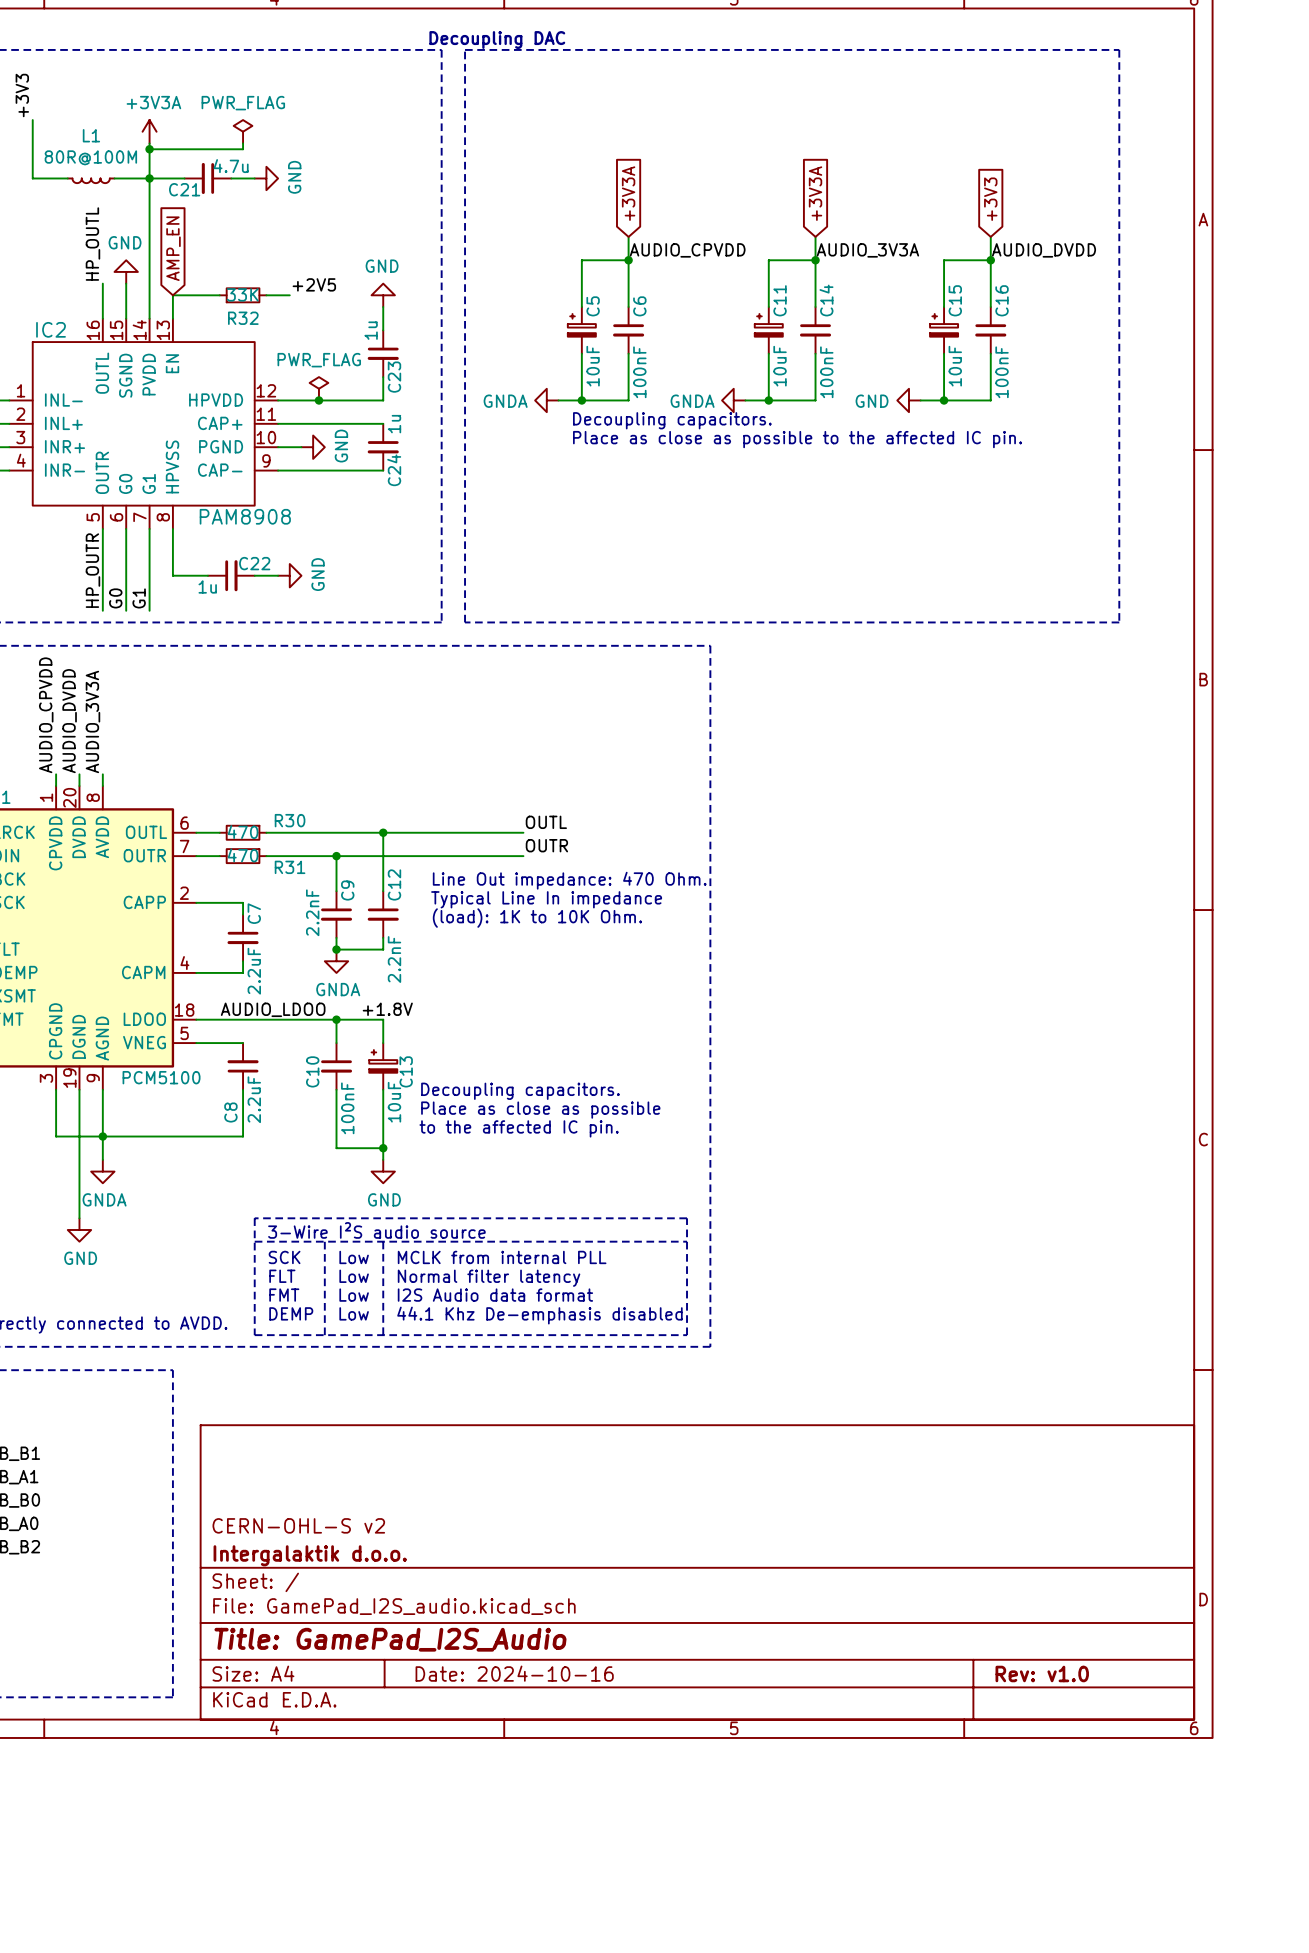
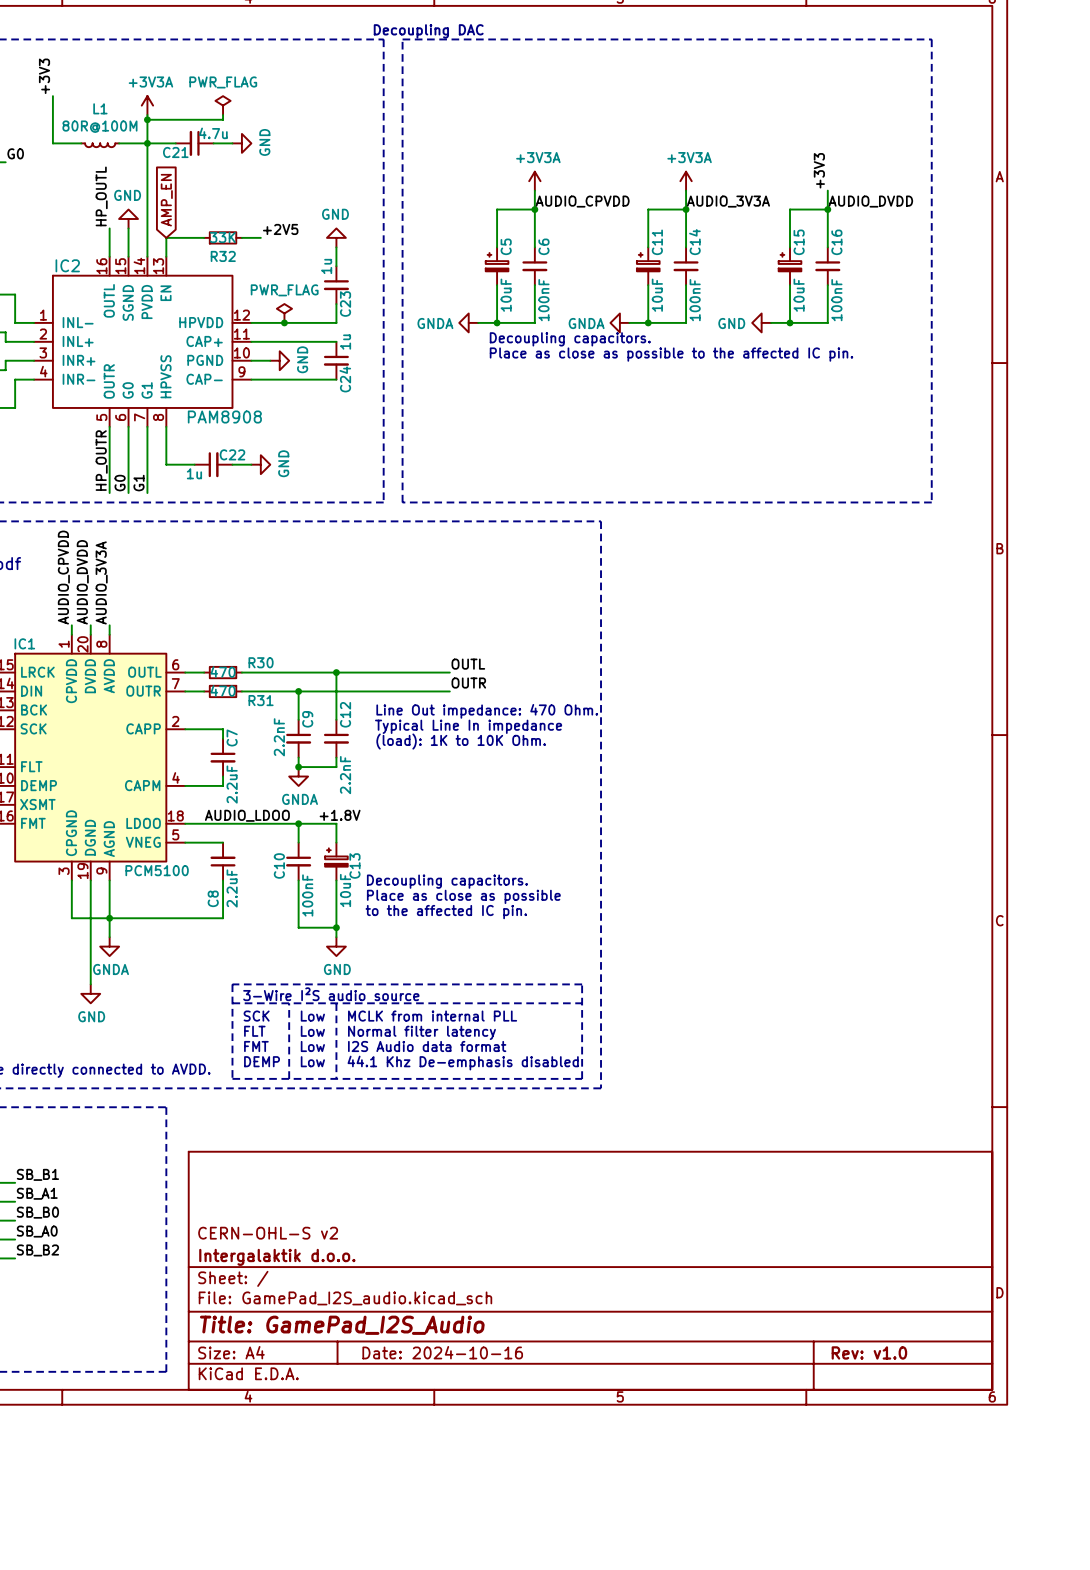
global label: +3V3A (628, 193) -> none
global label: +3V3A (815, 193) -> none
global label: +3V3 (990, 199) -> none
label: none -> +3V3 (819, 170)
power symbol: none -> +3V3A (534, 181)
power symbol: none -> +3V3A (686, 181)

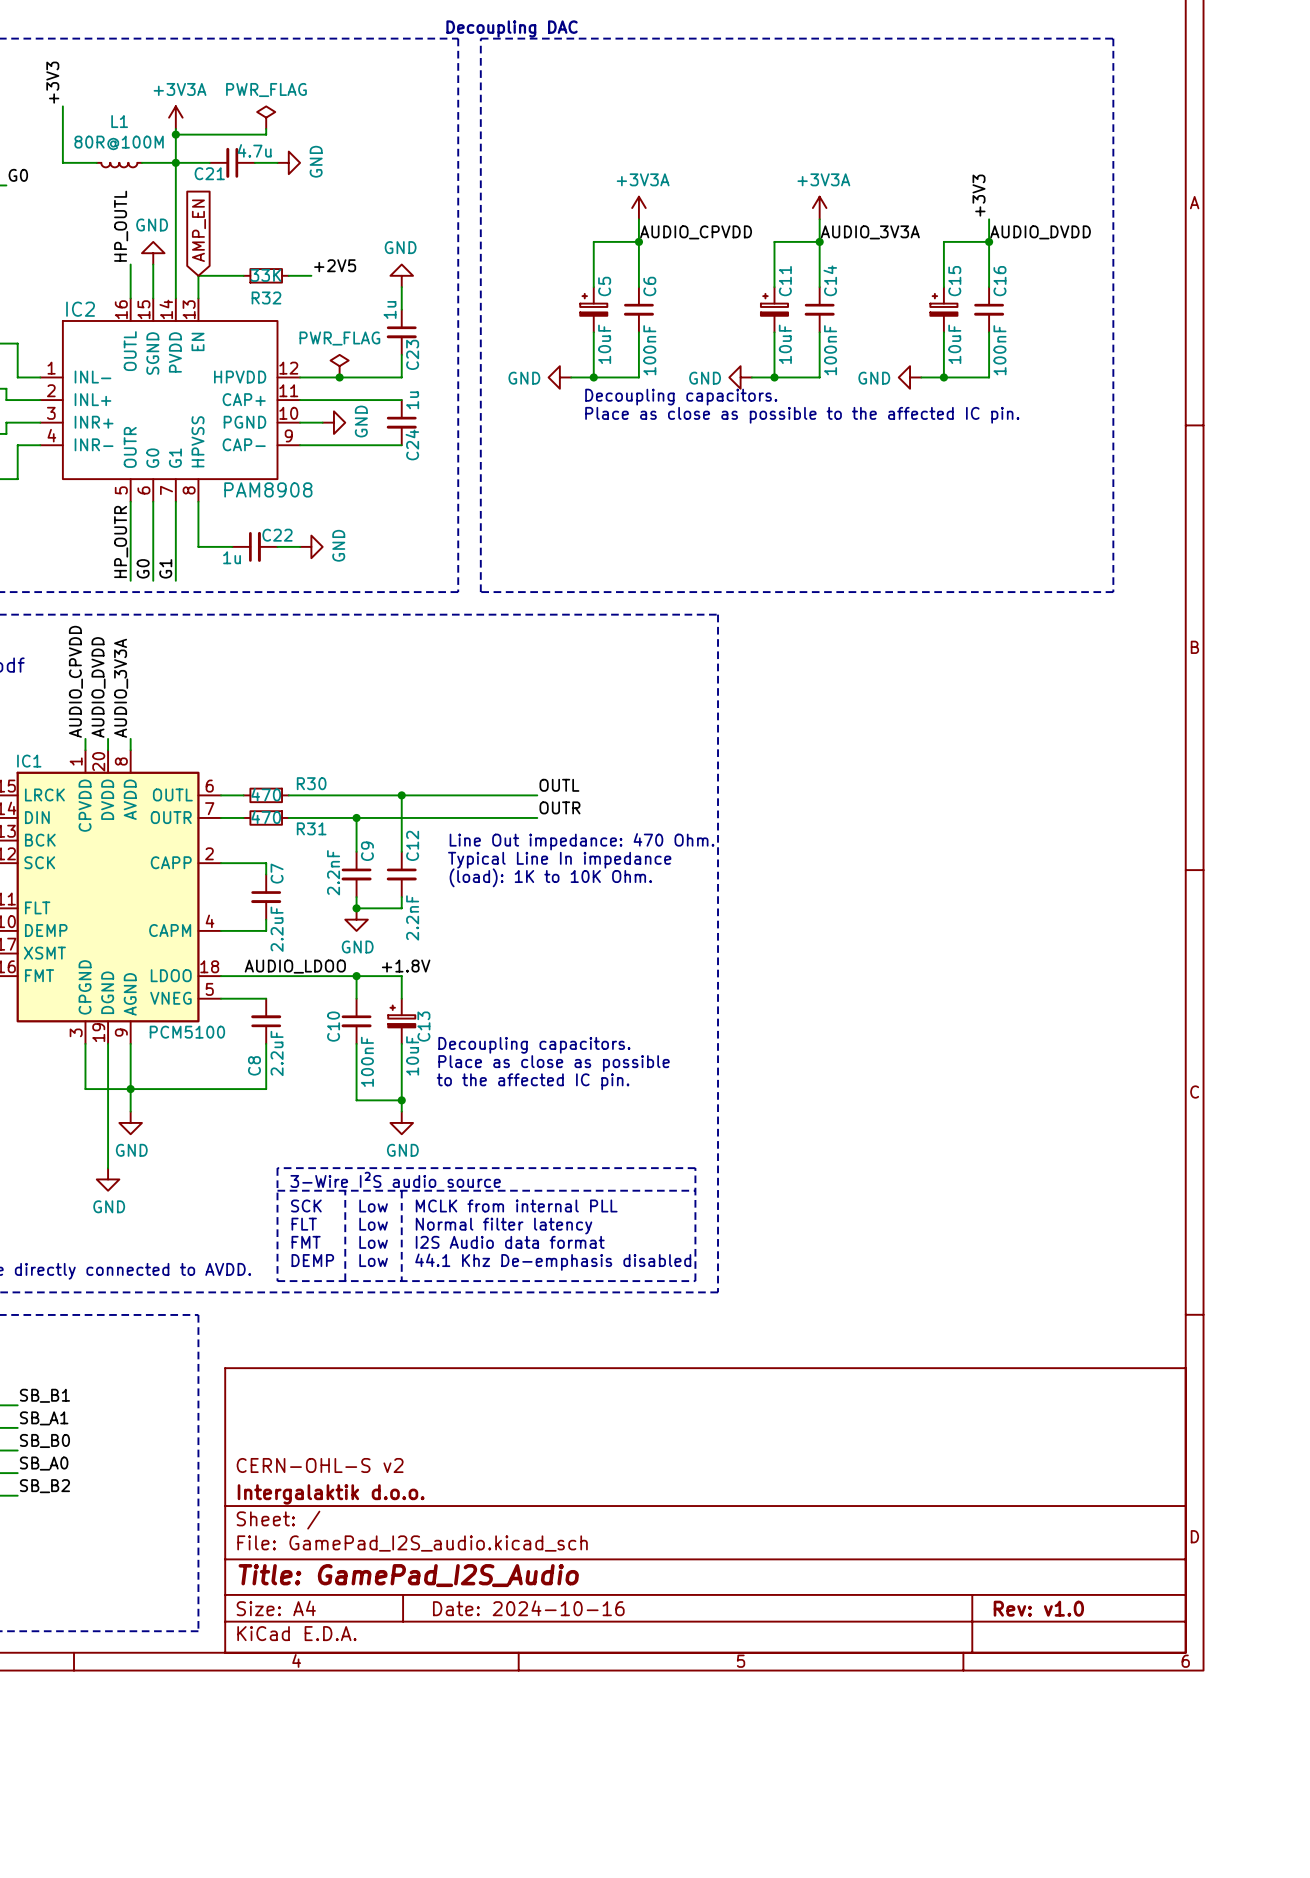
power symbol: GNDA (468, 322) -> GND (559, 377)
power symbol: GNDA (619, 322) -> GND (740, 377)
power symbol: GNDA (298, 776) -> GND (356, 919)
power symbol: GNDA (109, 946) -> GND (130, 1122)

